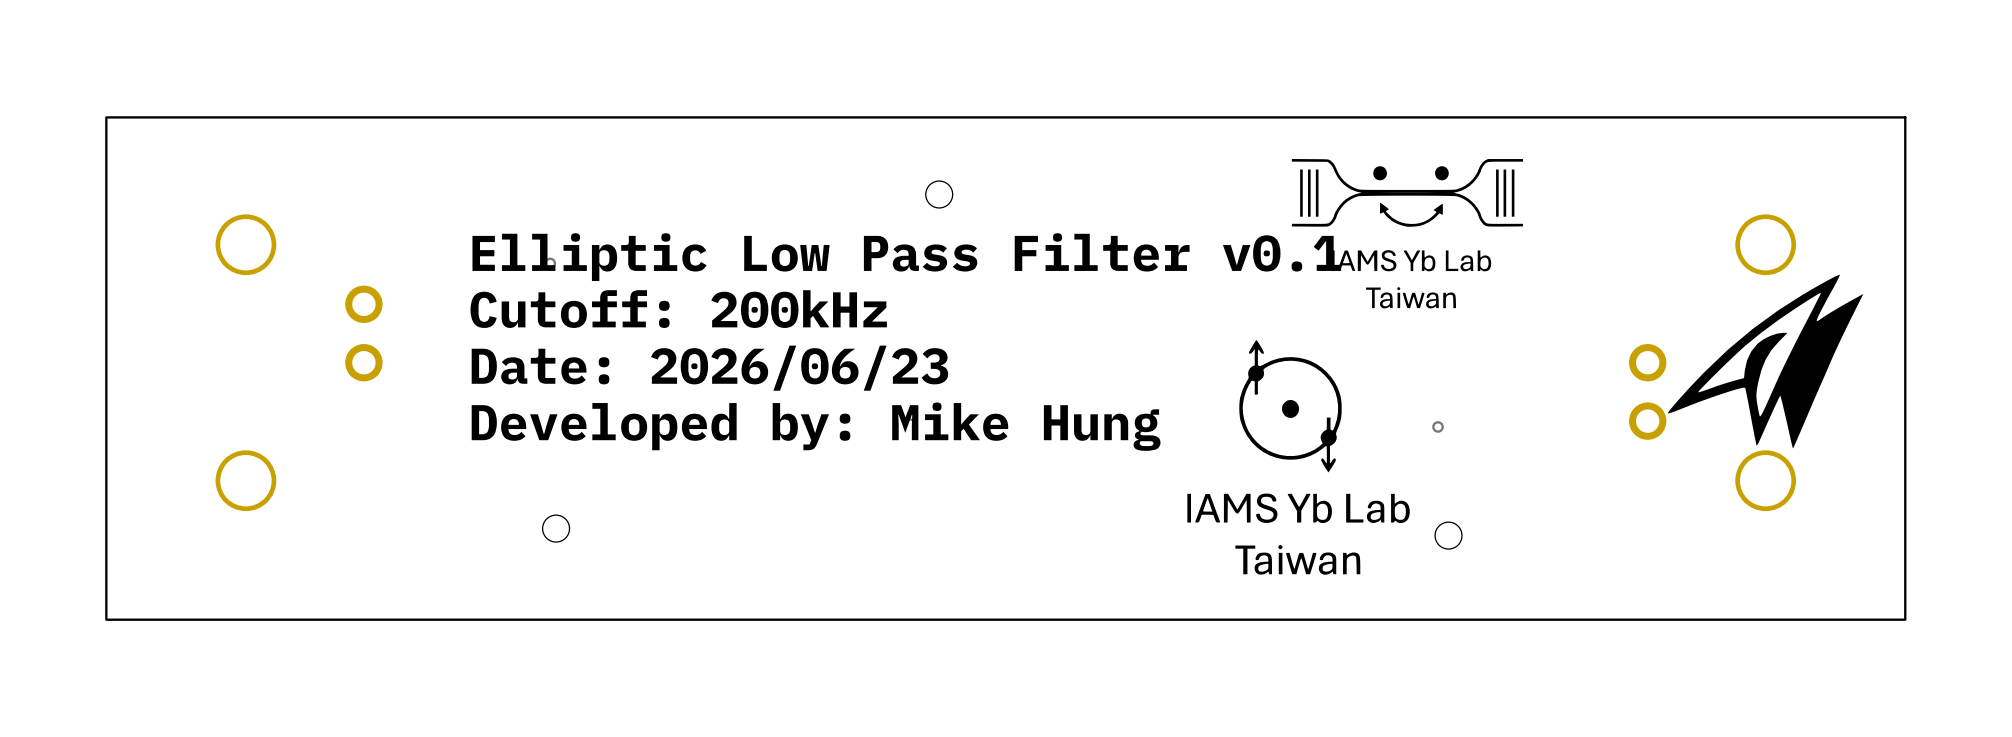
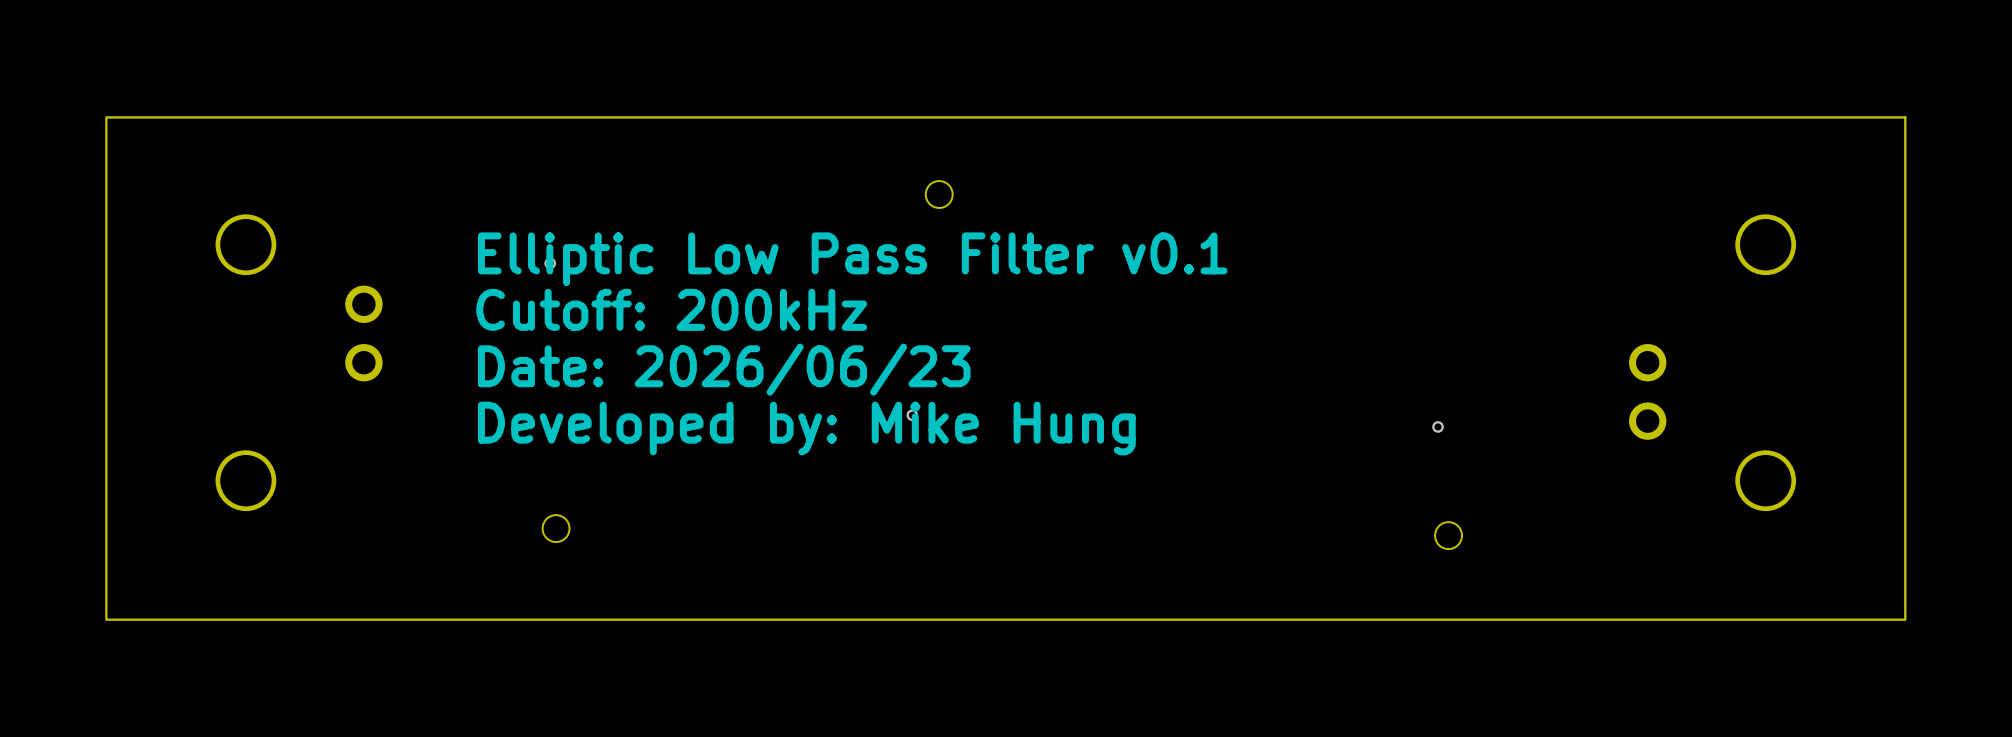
drawing: [1291, 159, 1524, 309] -> none
drawing: [1667, 274, 1864, 449] -> none
drawing: [1187, 340, 1410, 575] -> none

